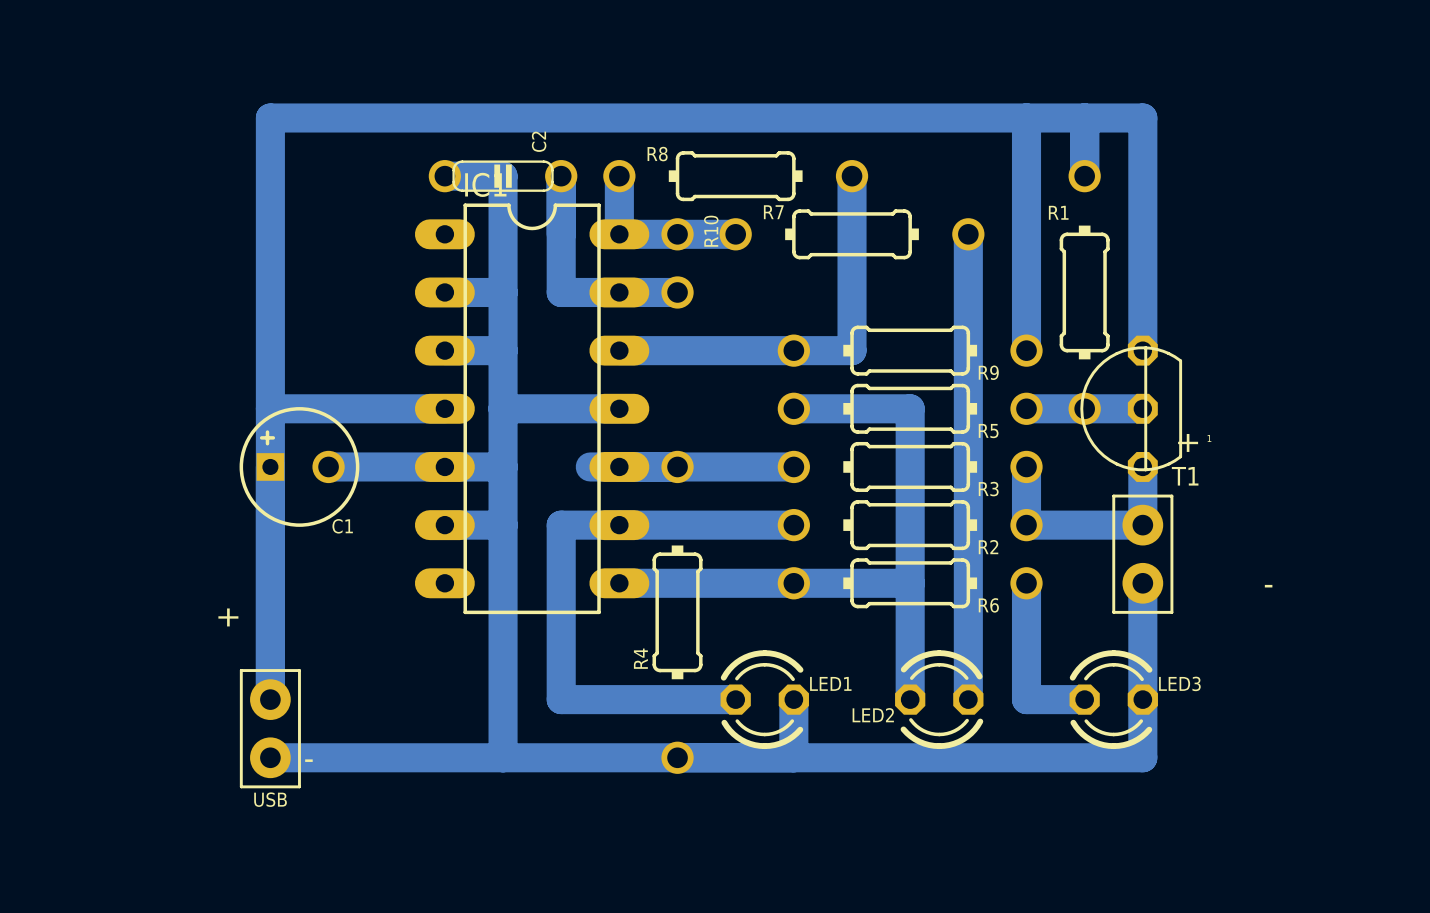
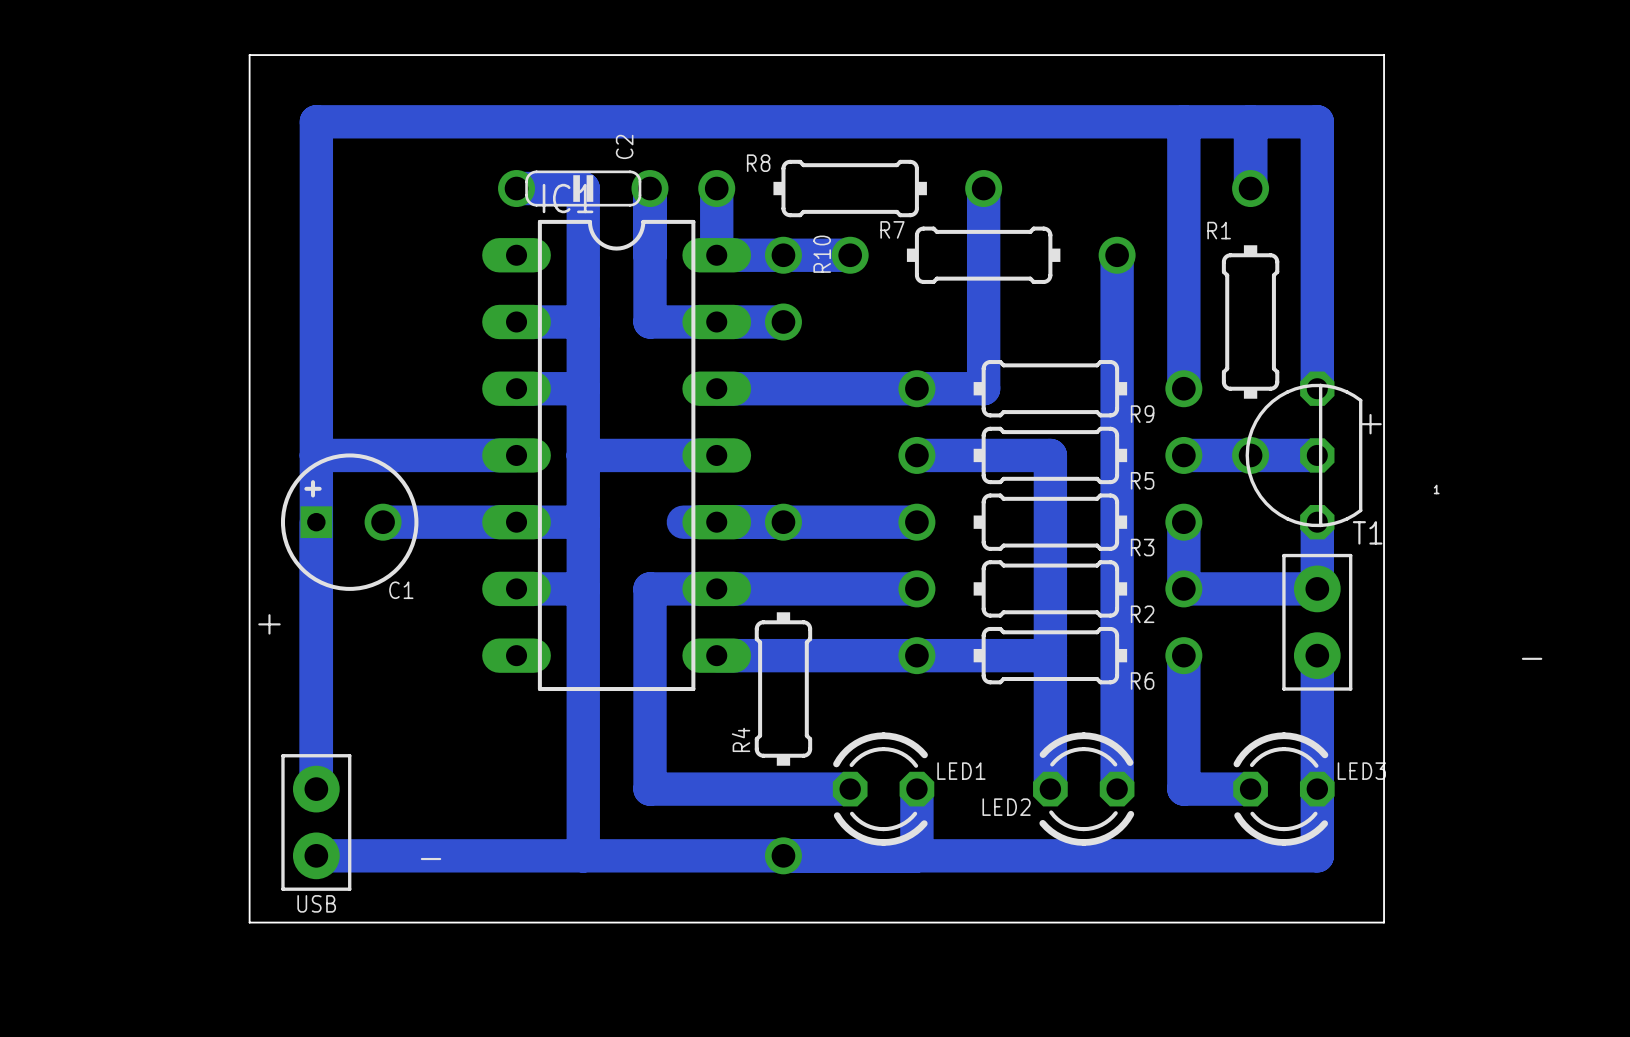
board edge: none -> (249, 55) (1384, 55) (1384, 922) (249, 922) (249, 55)

